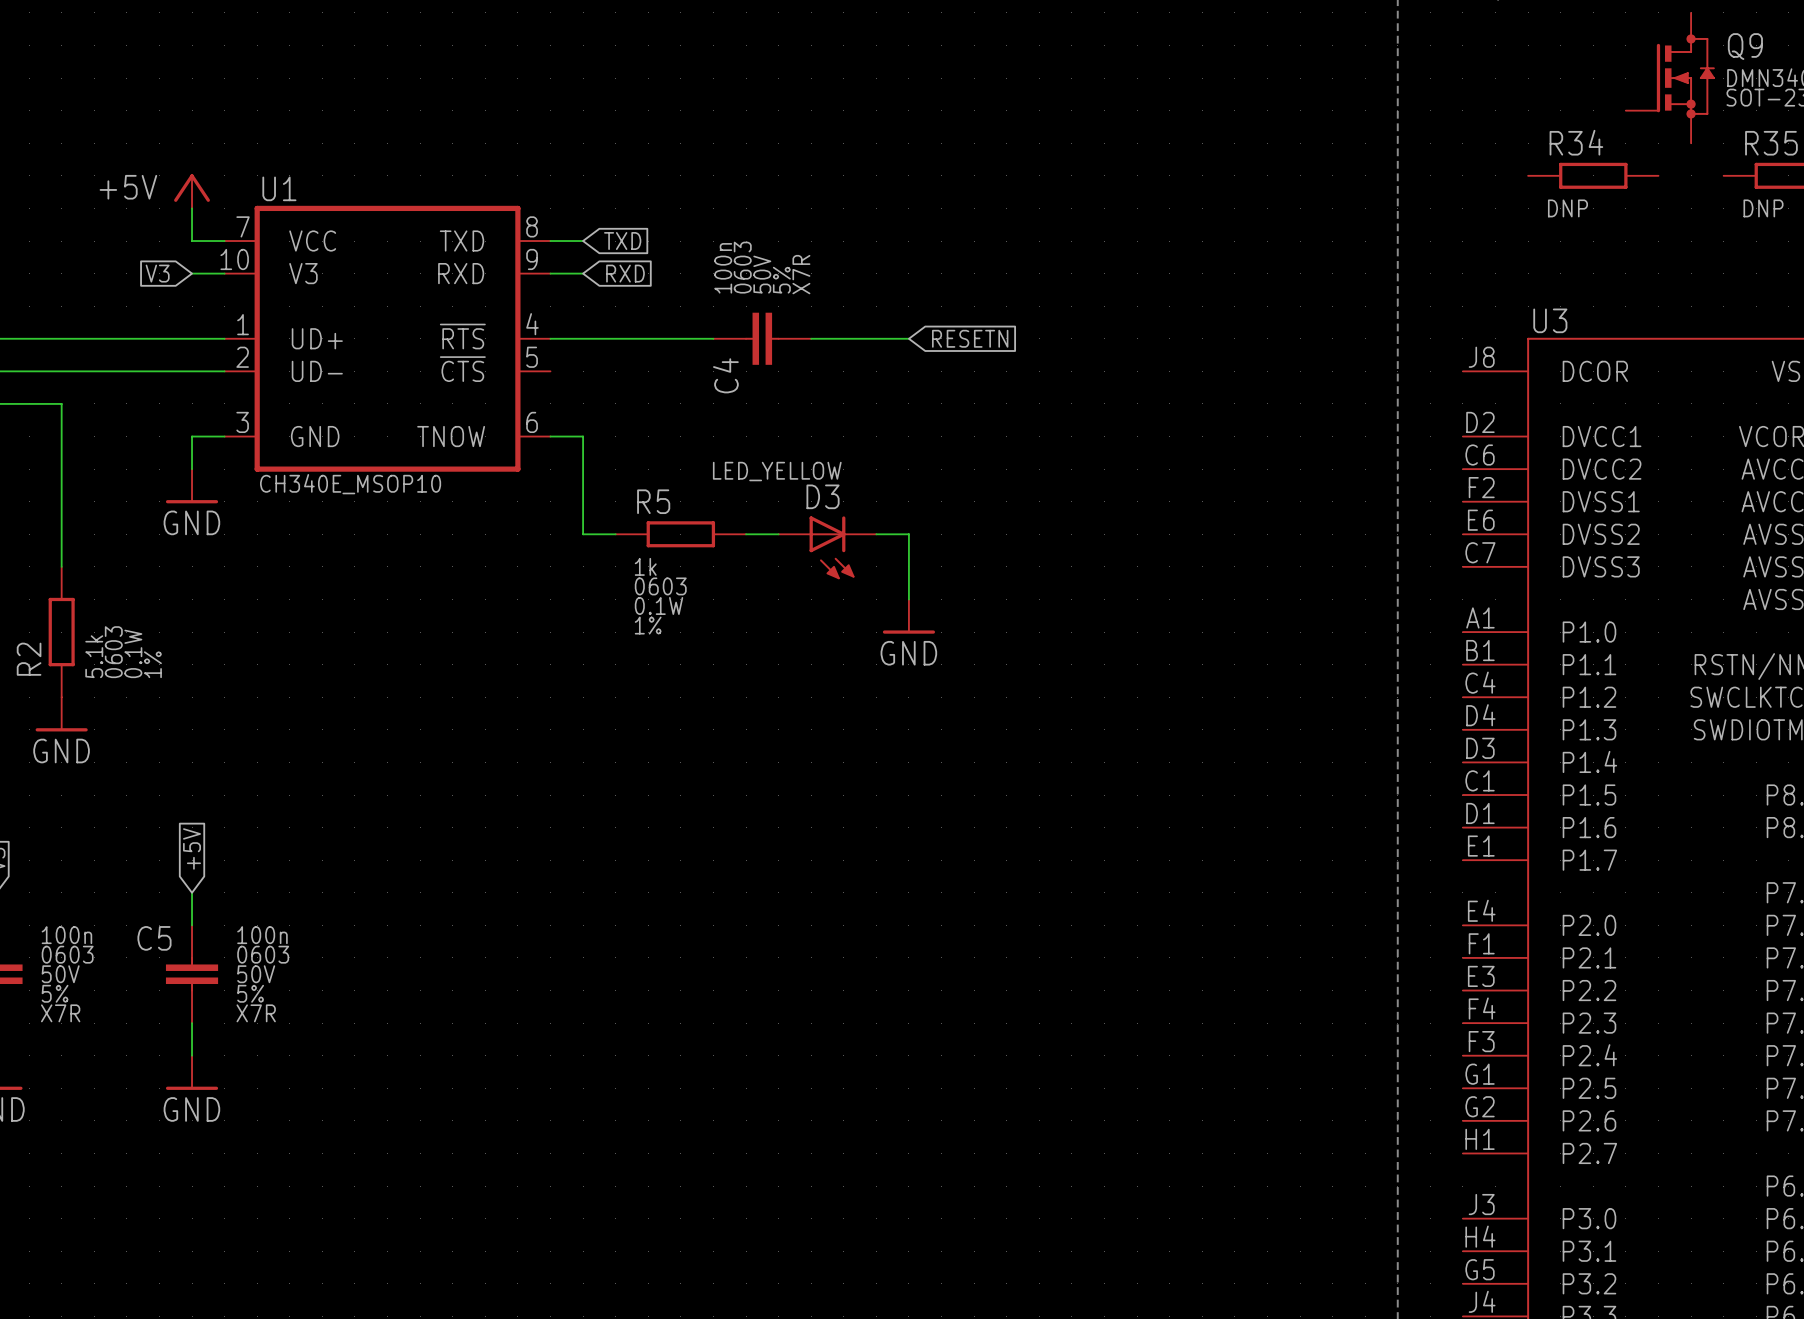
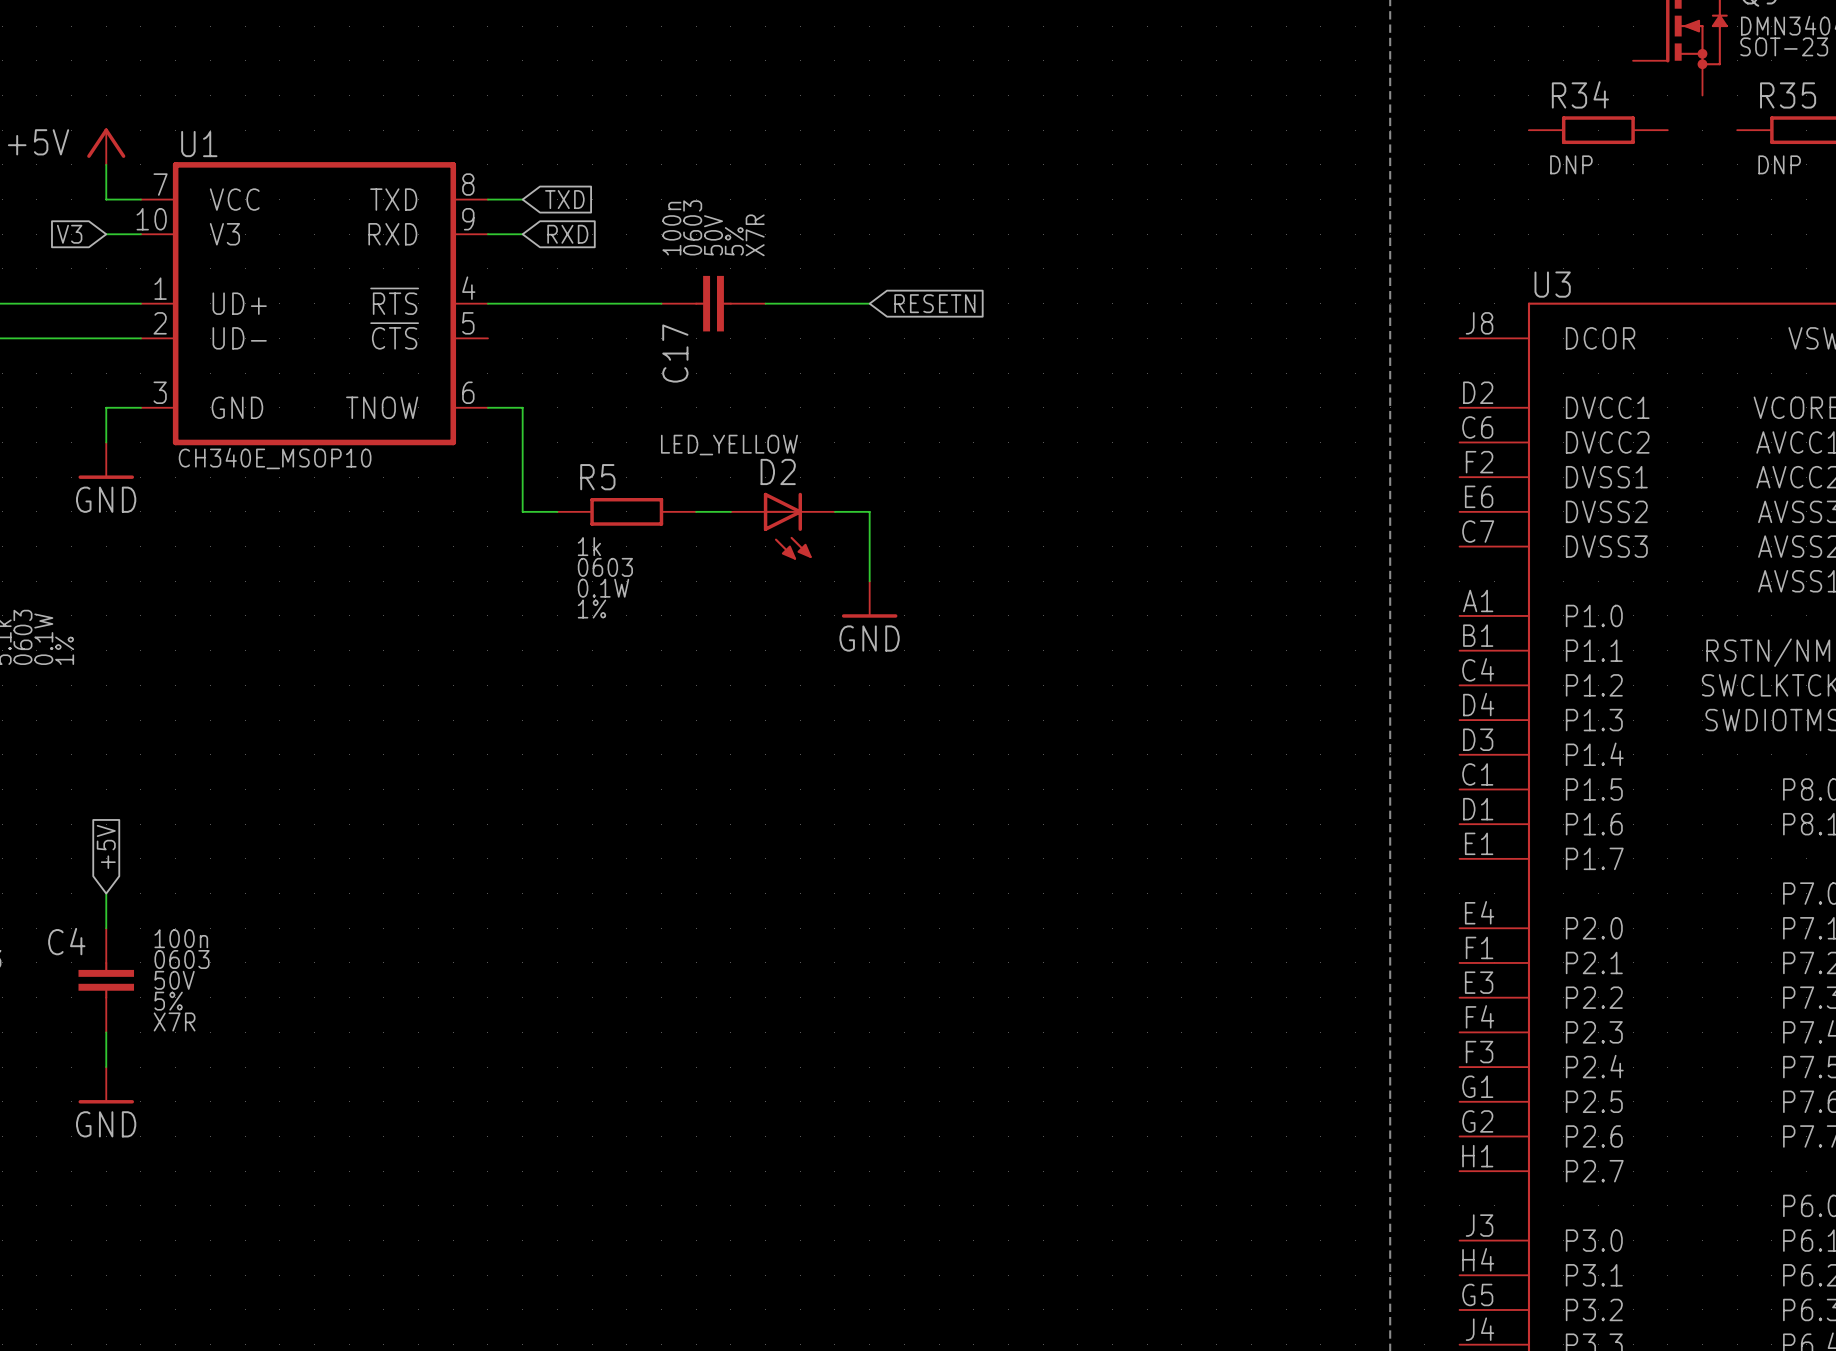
C4 name: C4 (725, 375) -> C17 (675, 353)
D3 name: D3 (823, 496) -> D2 (778, 471)
C5 name: C5 (154, 938) -> C4 (66, 941)

